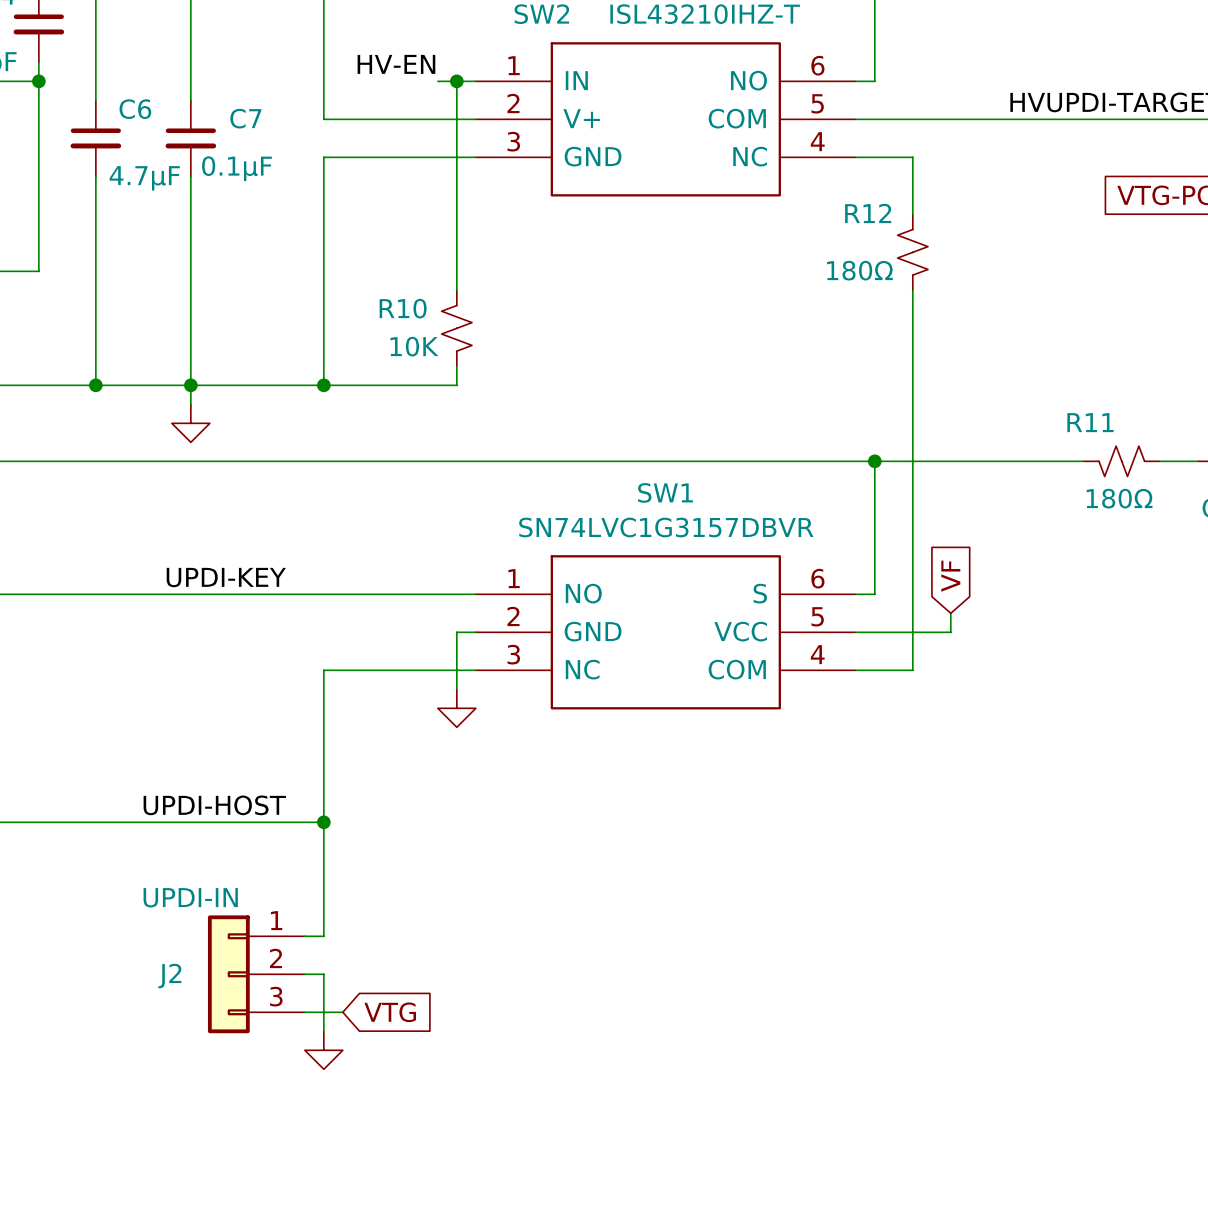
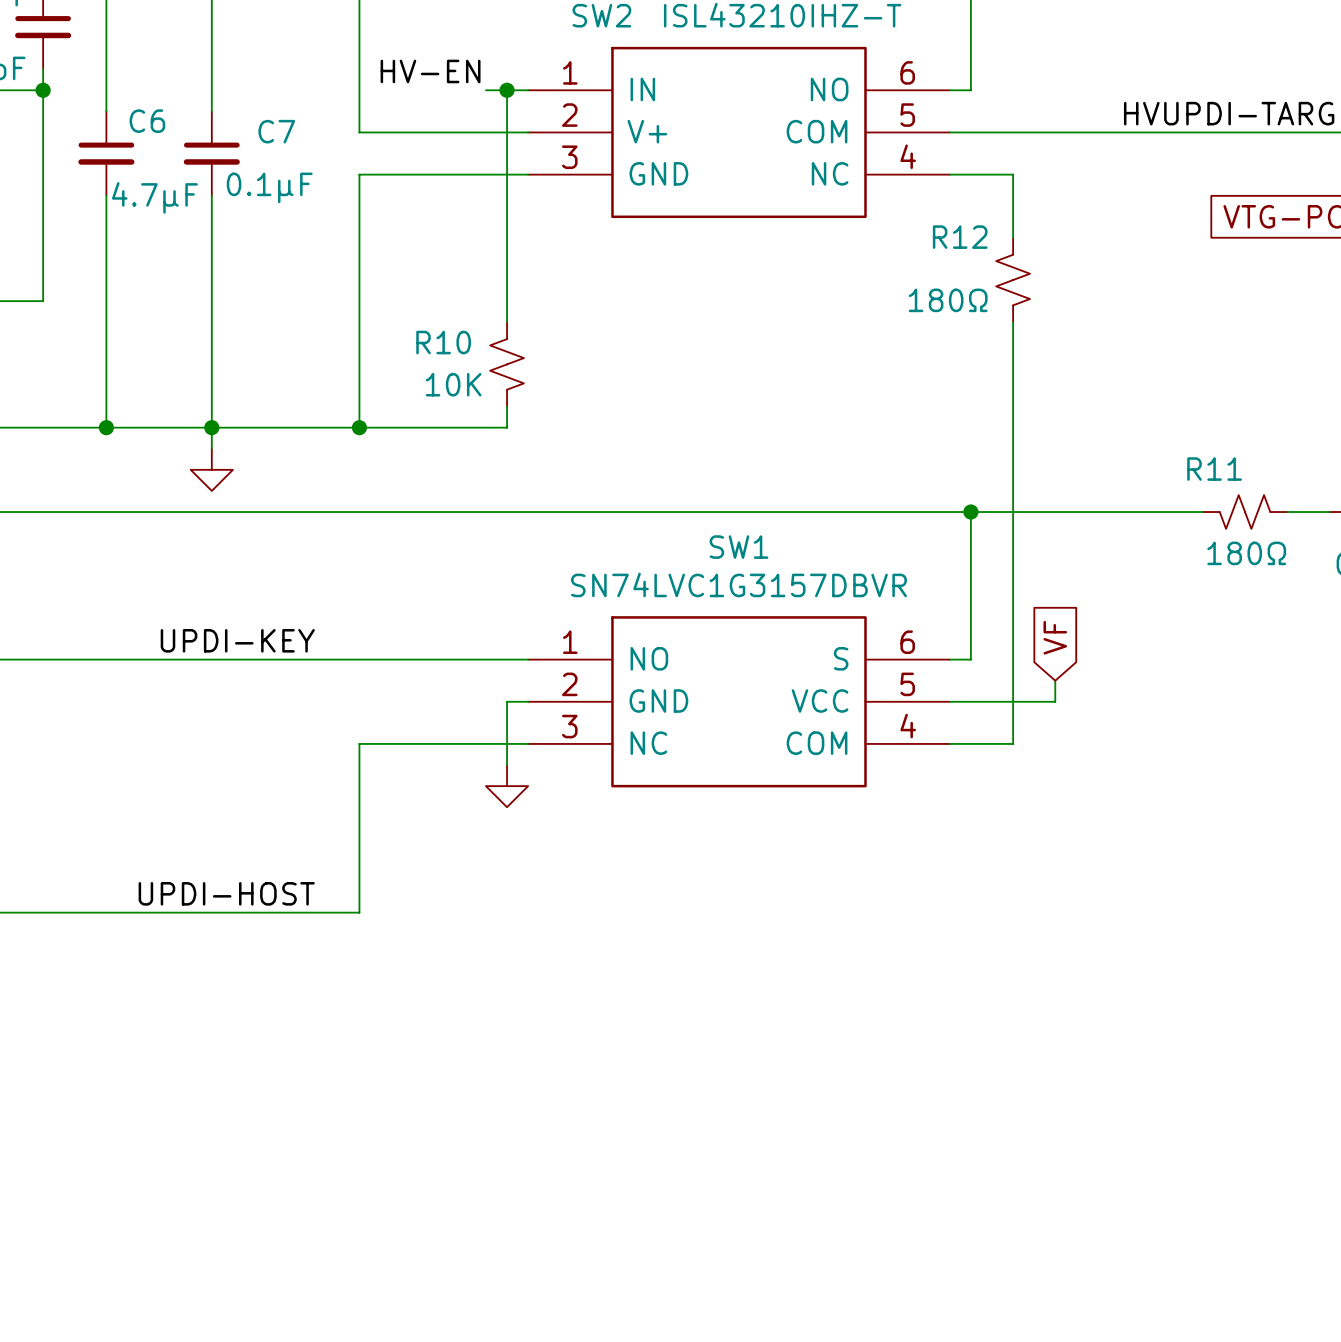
wire: (323, 822) (323, 936) (304, 936) -> none
junction: (323, 822) -> none
J2: UPDI-IN (256, 974) -> none
wire: (304, 974) (323, 974) (323, 1031) -> none
wire: (304, 1012) (342, 1012) -> none
global label: VTG (390, 1012) -> none
power symbol: (323, 1050) -> none

